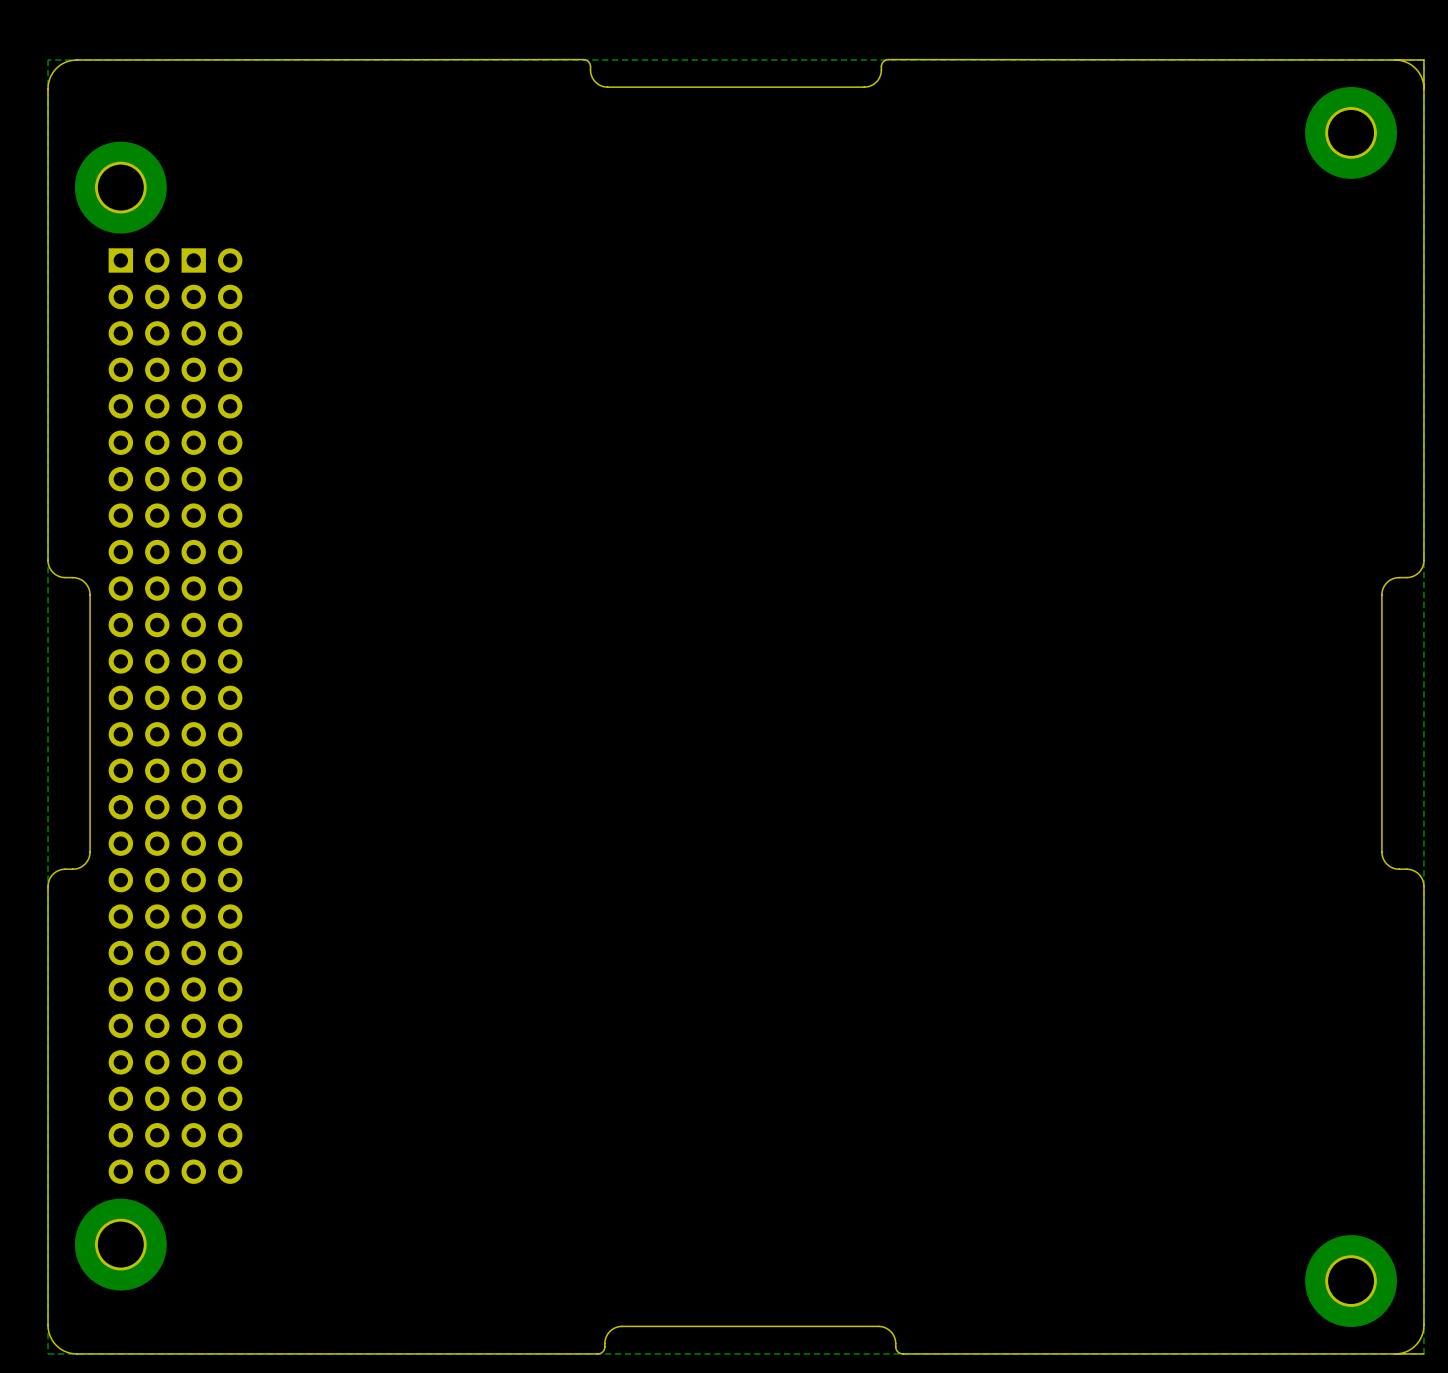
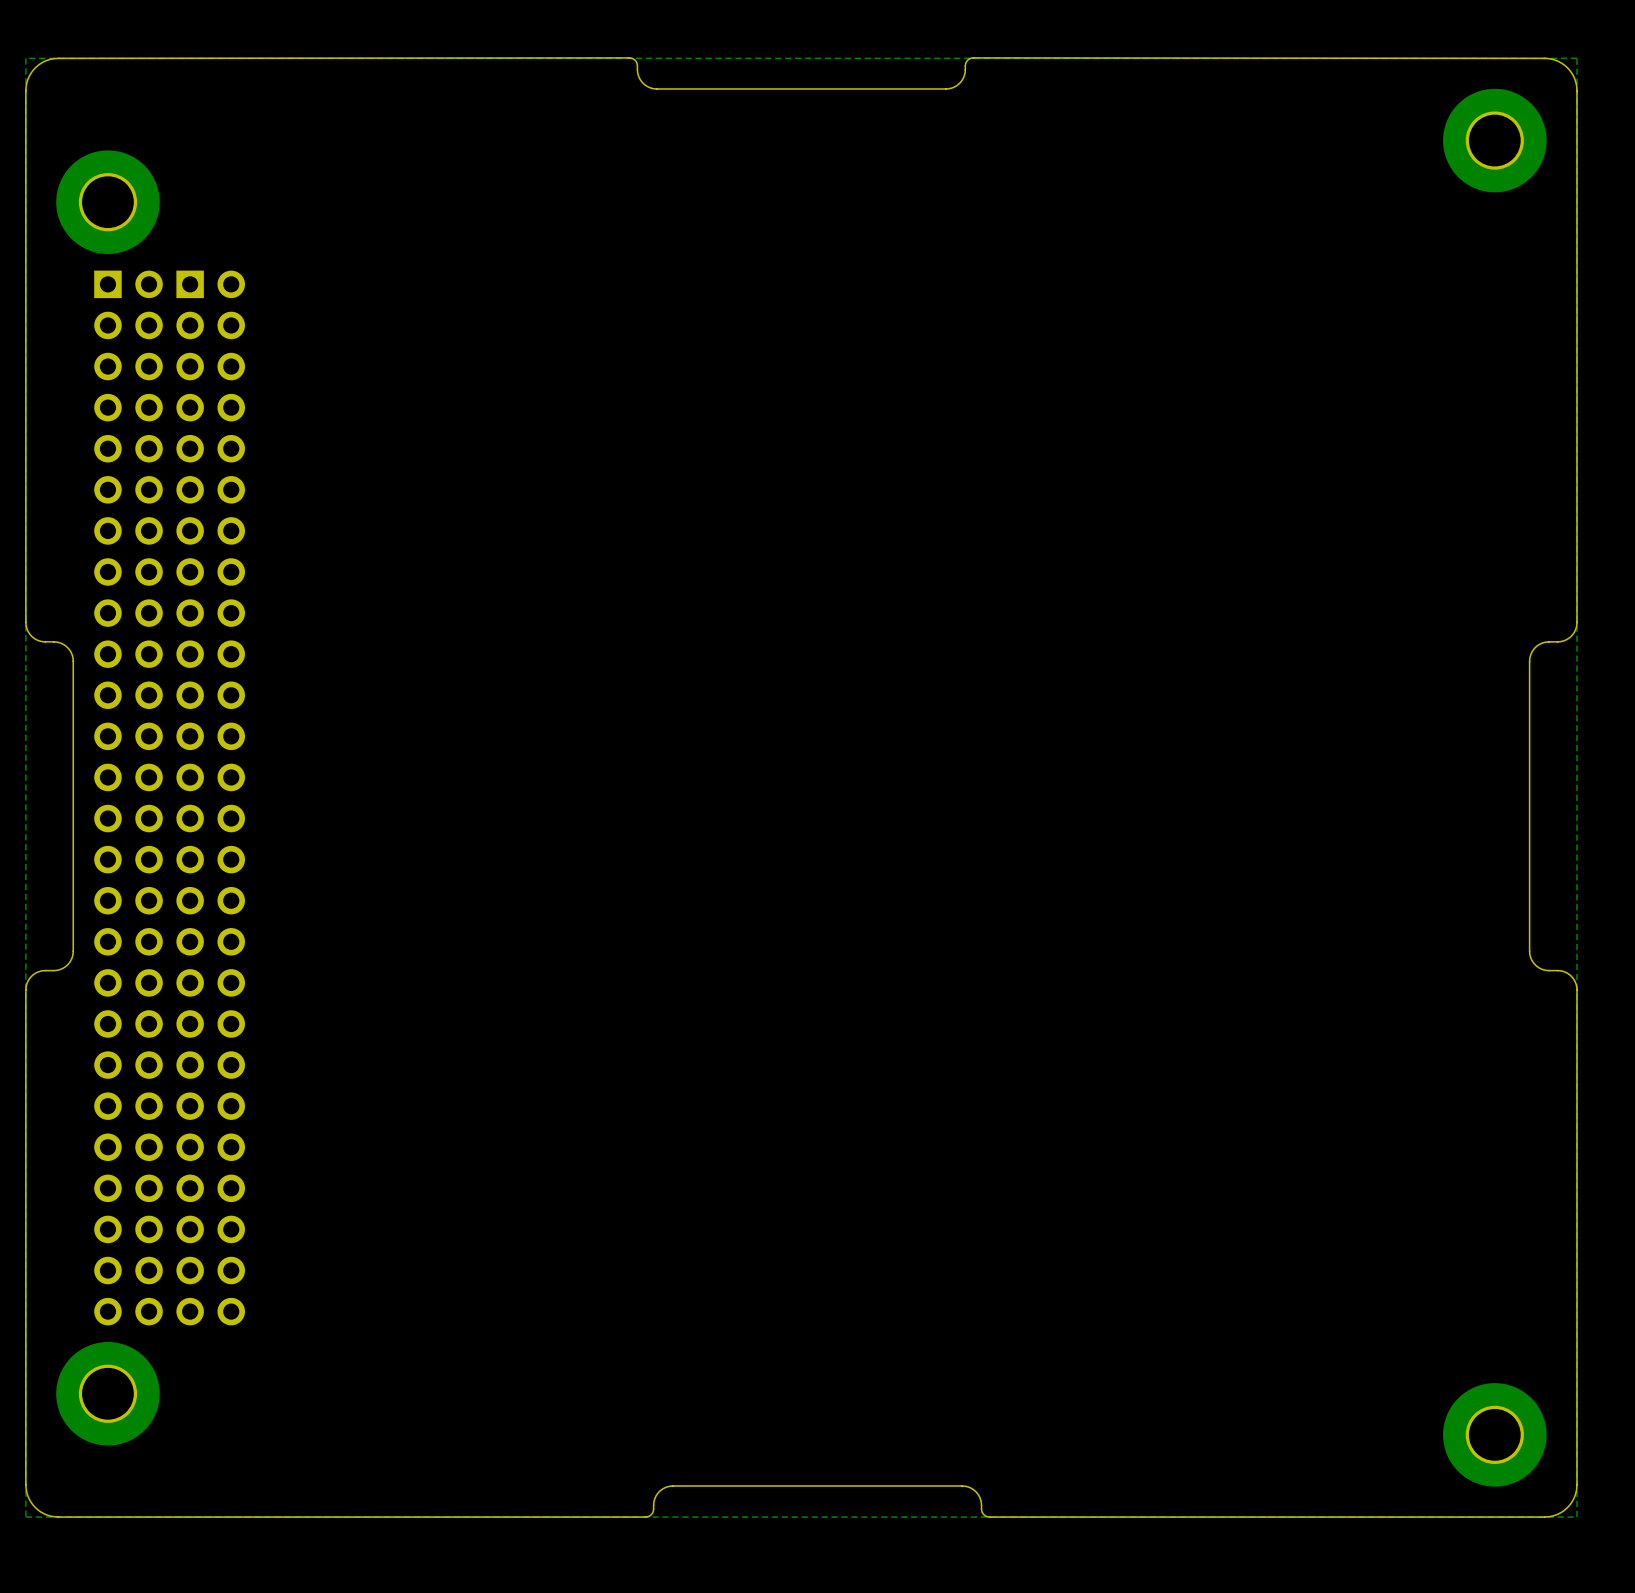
board edge: (888, 59) (1423, 60) (1423, 88) -> (973, 57) (1544, 58)
board edge: (1423, 1353) (1395, 1353) -> none

